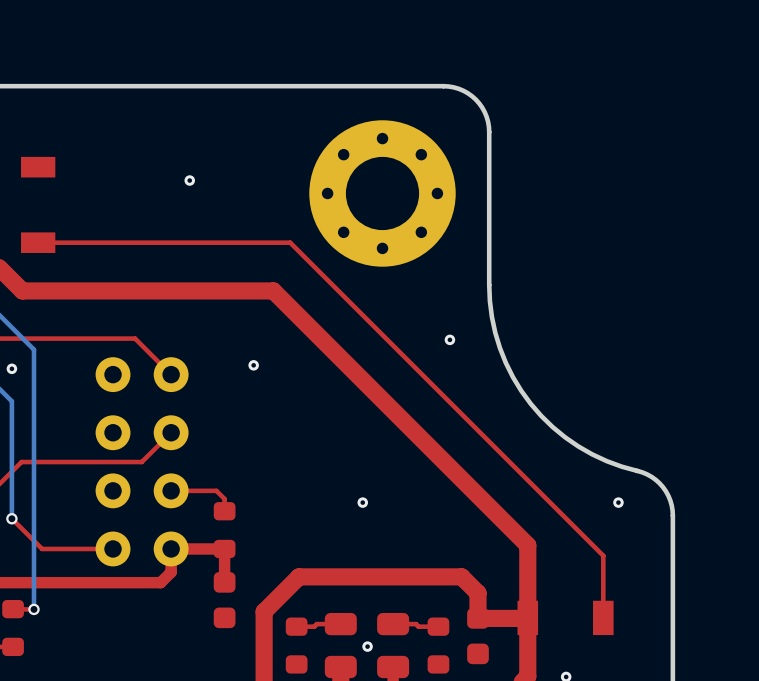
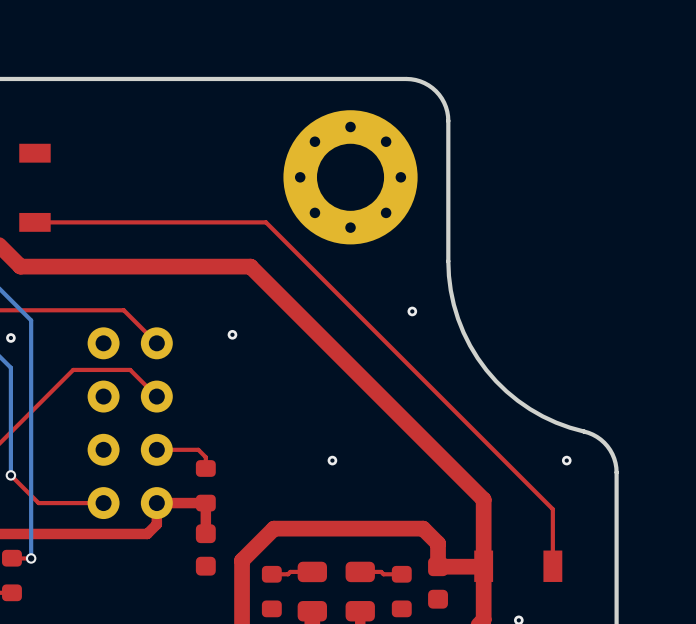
via: (189, 180) -> none
top track: (171, 432) (141, 462) (21, 462) -> (156, 396) (130, 369) (73, 369) (19, 423)
via: (367, 646) -> none

